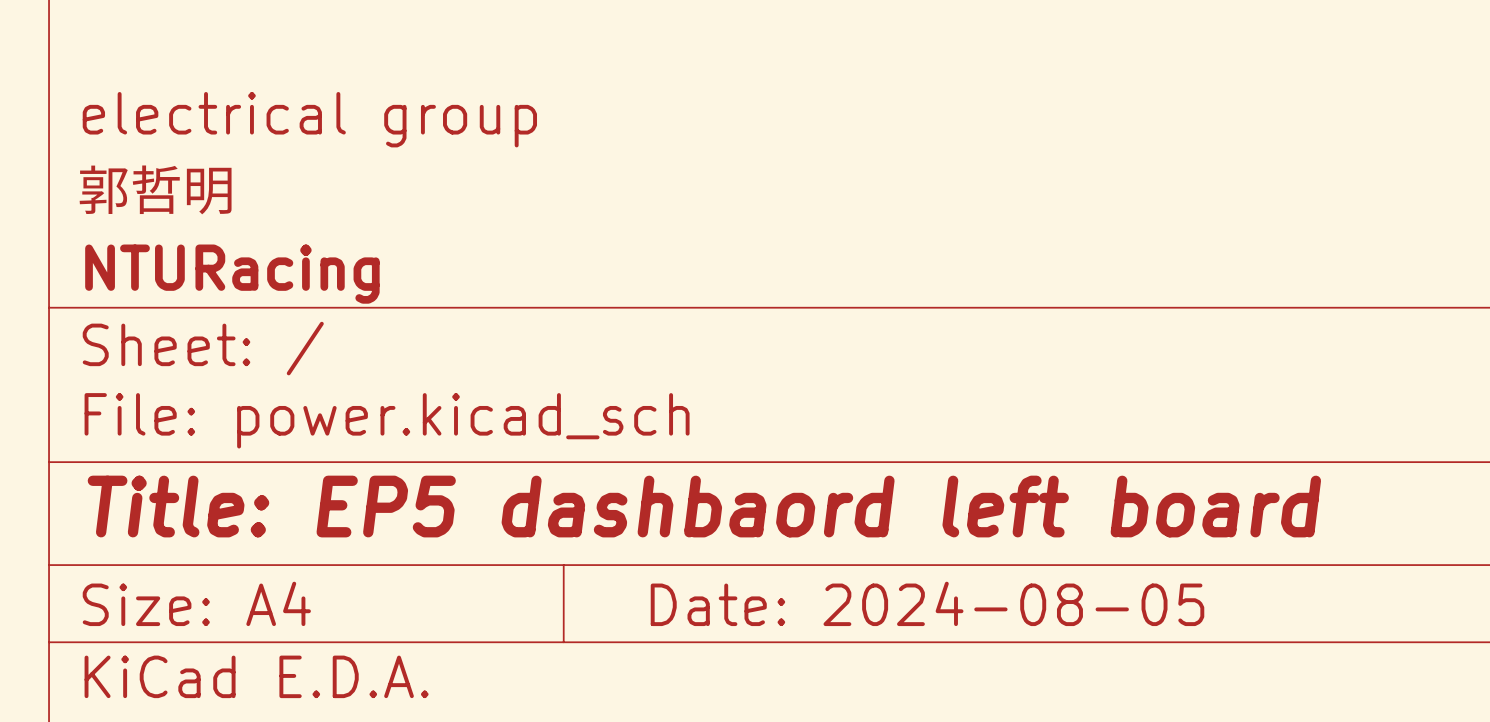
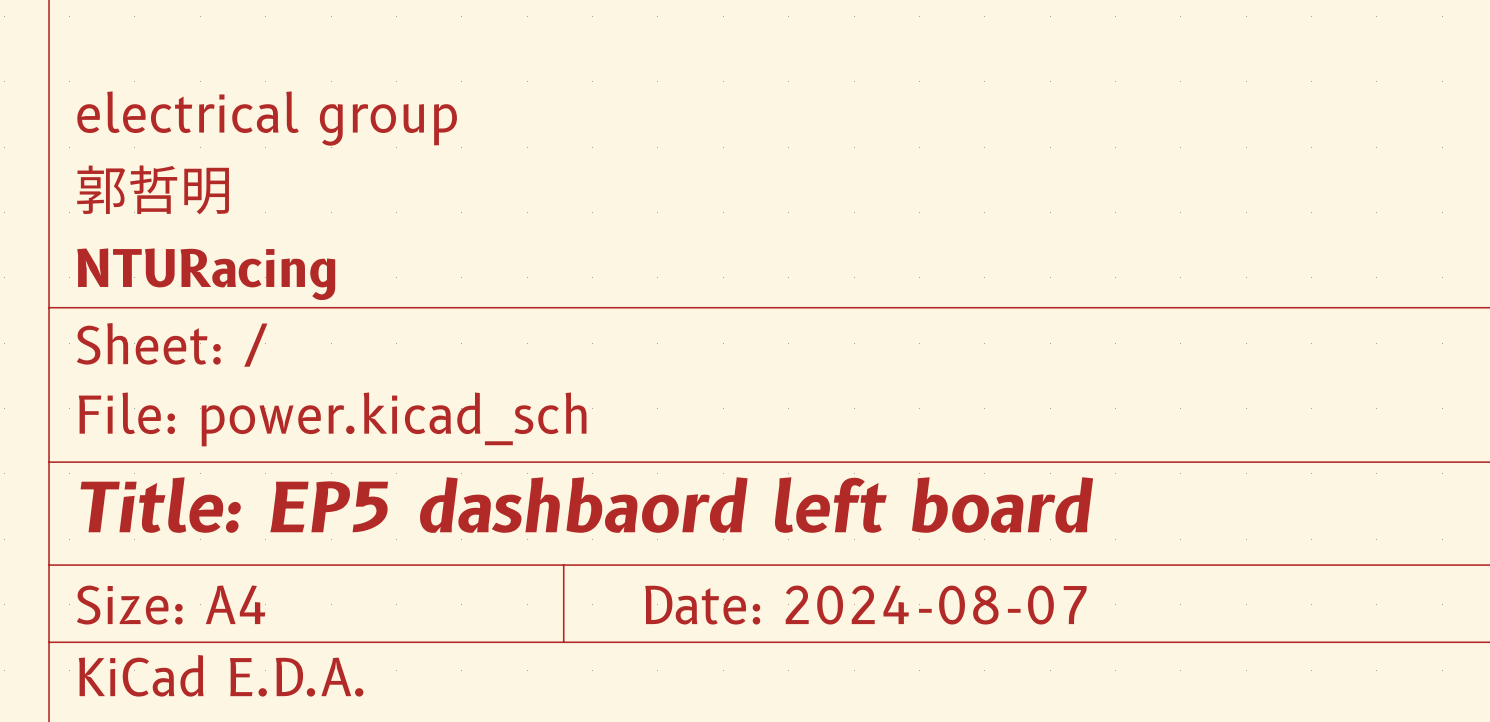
title block: Date: 2024-08-05 (927, 603) -> Date: 2024-08-07 (865, 605)

